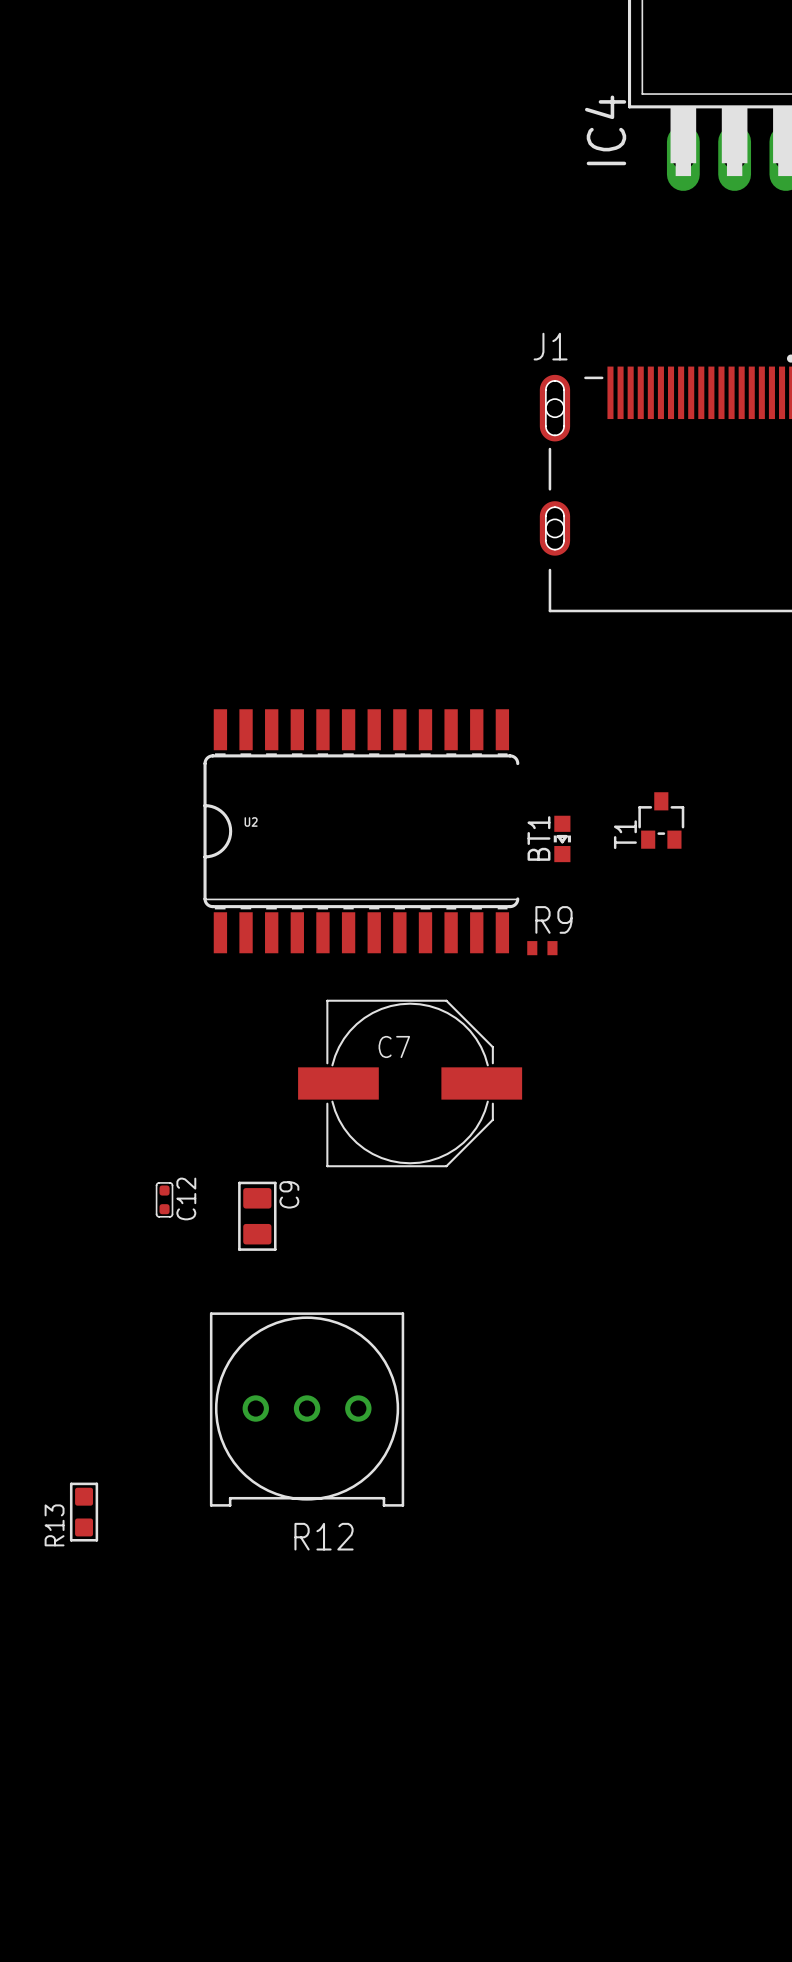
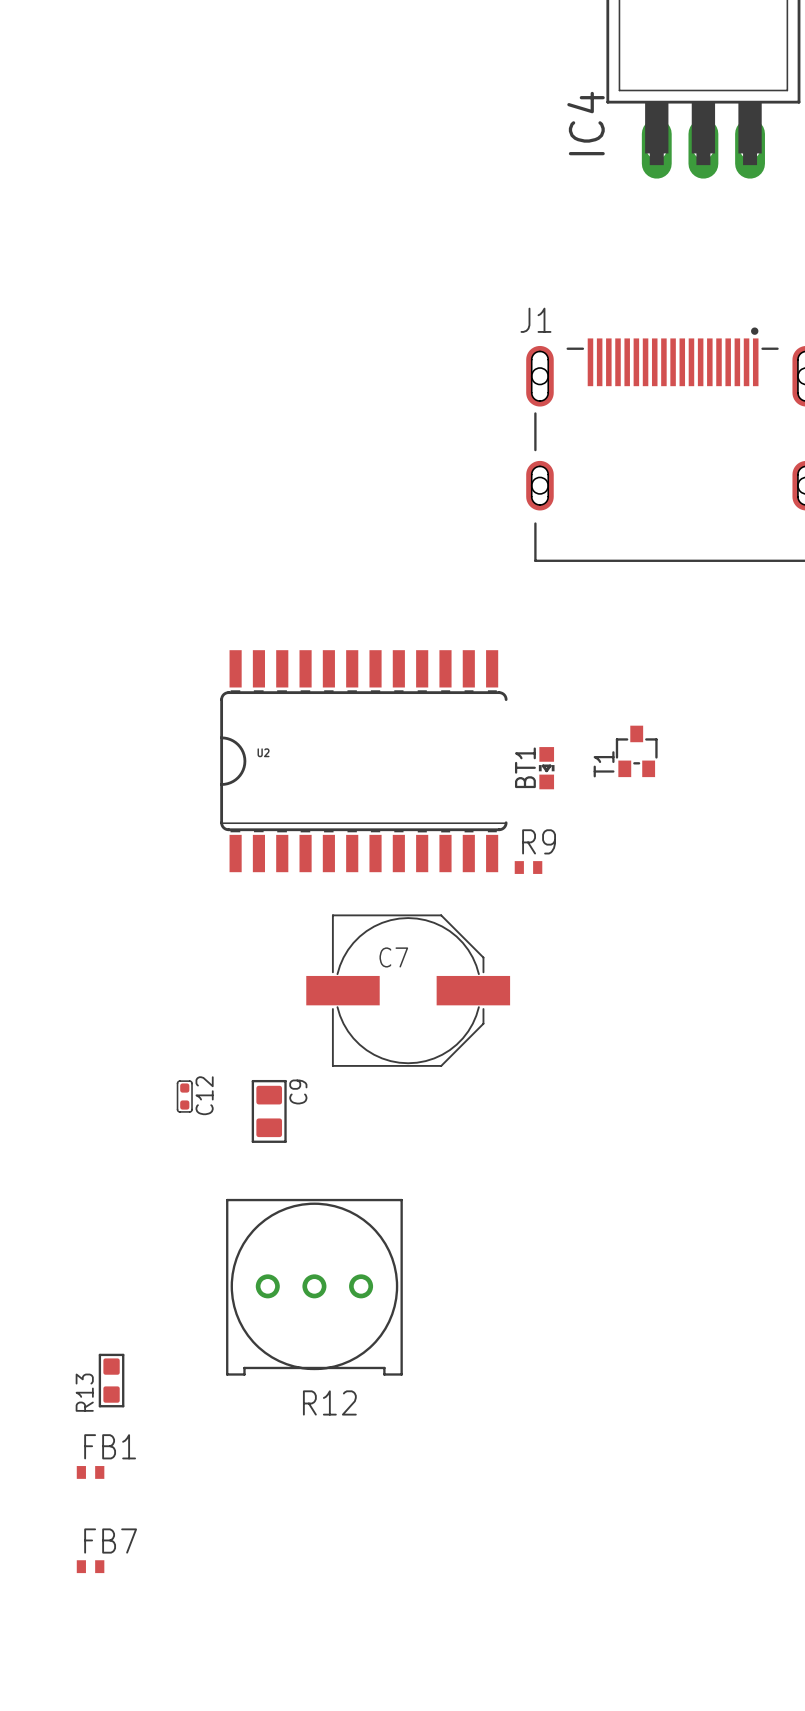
FB1: none -> (90, 1472)
FB7: none -> (90, 1566)

